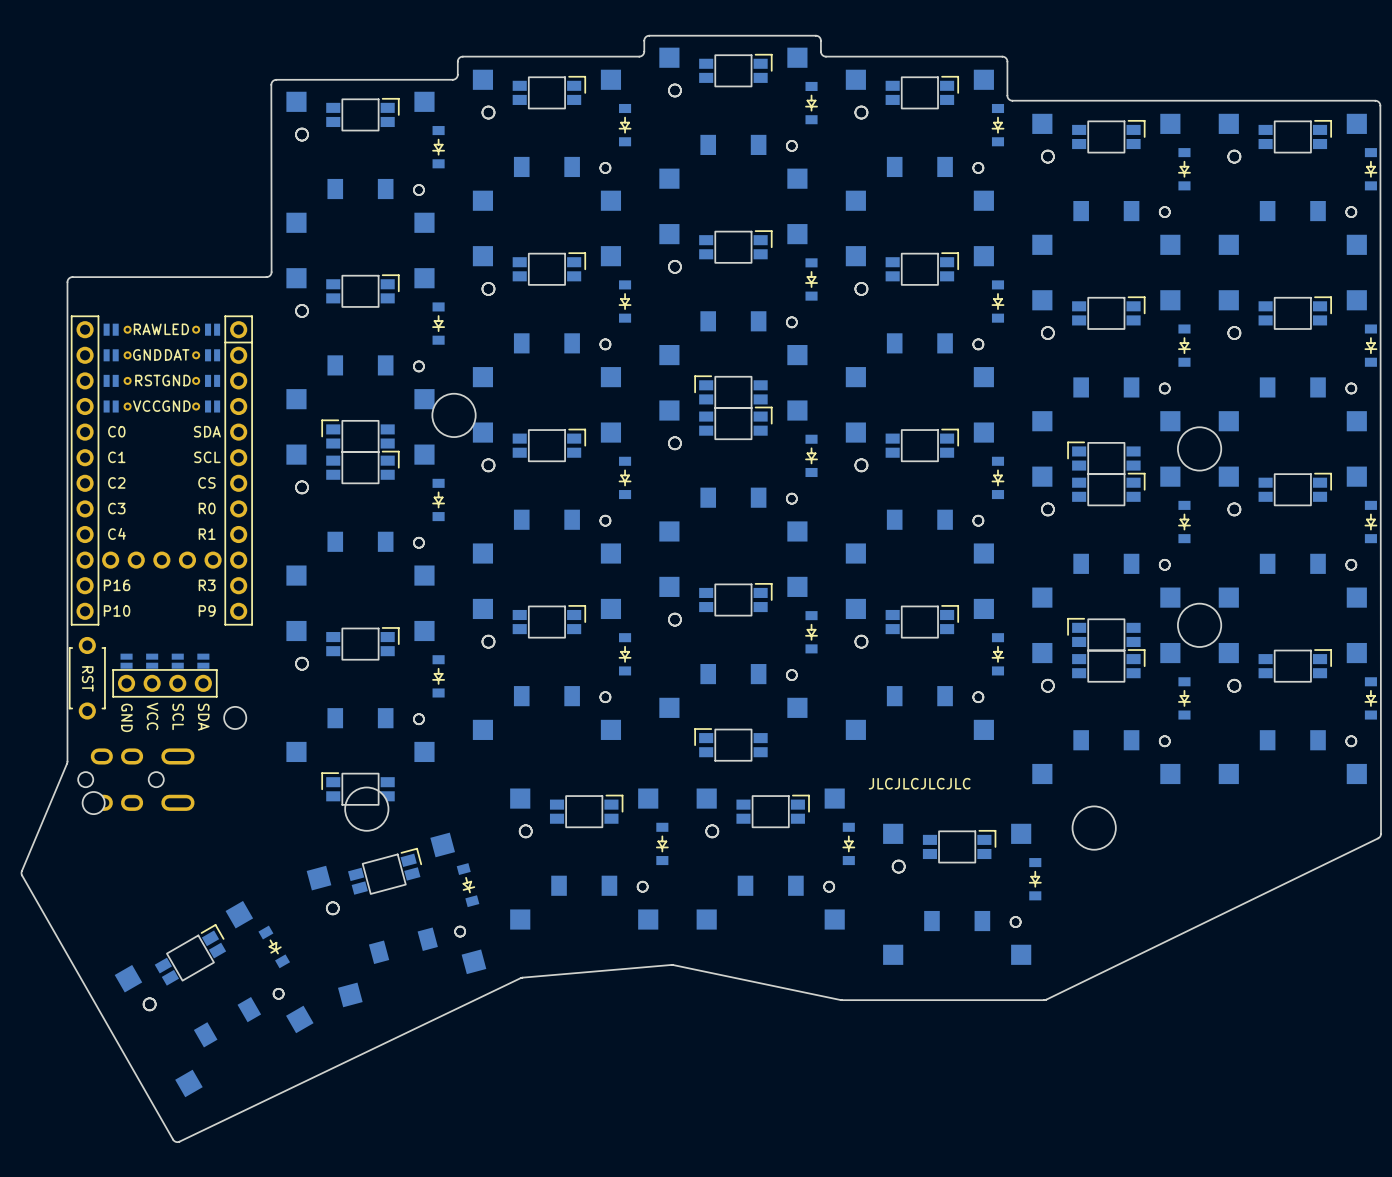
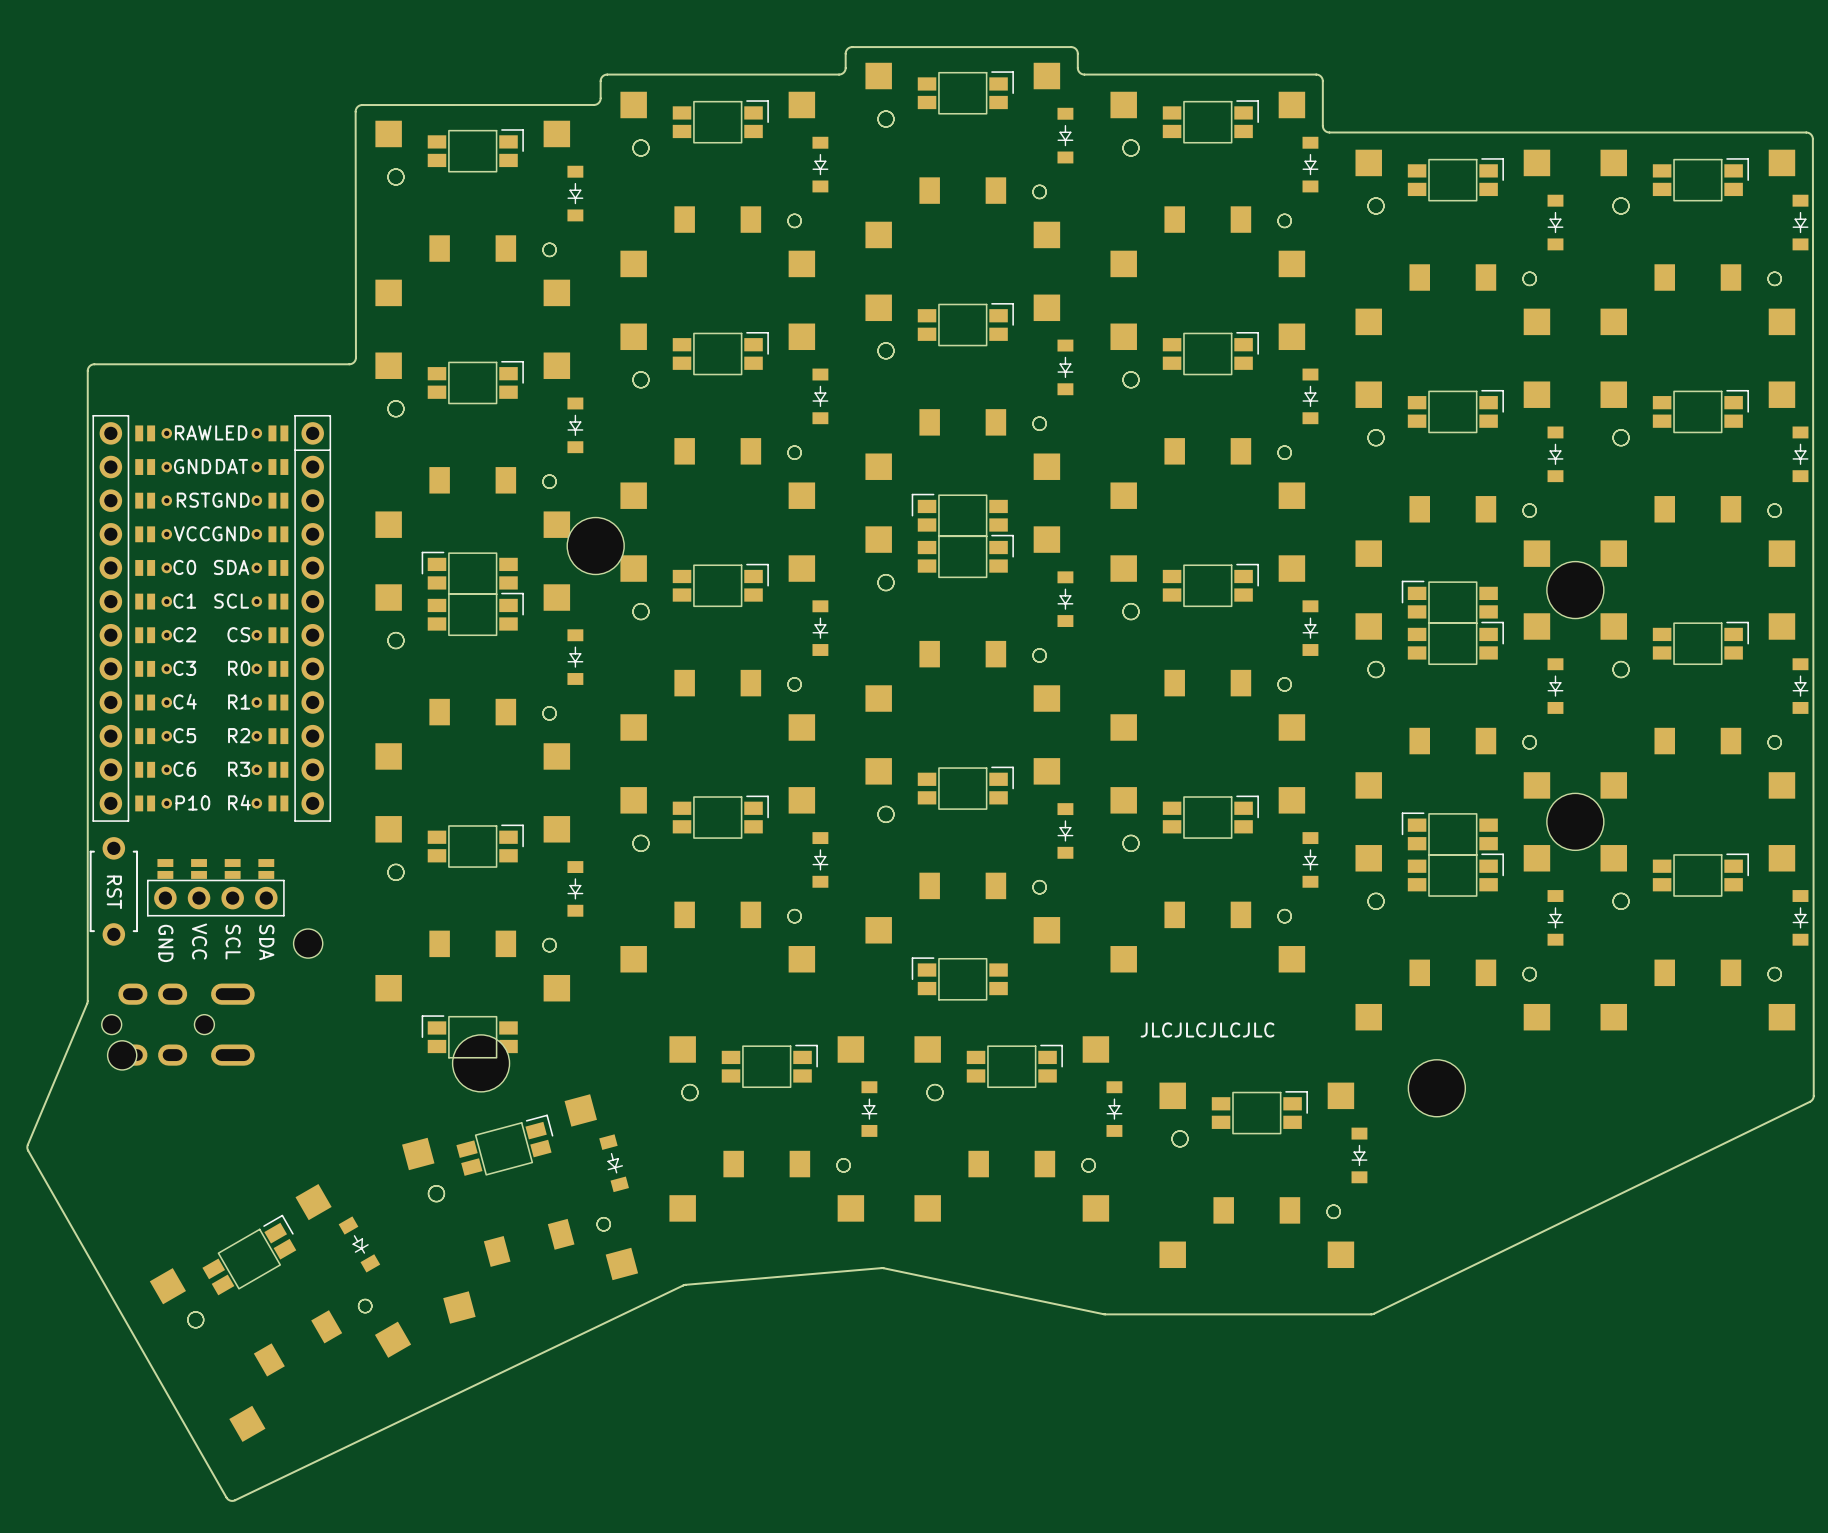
part footprint: [71, 315, 253, 626] -> [92, 414, 332, 822]

